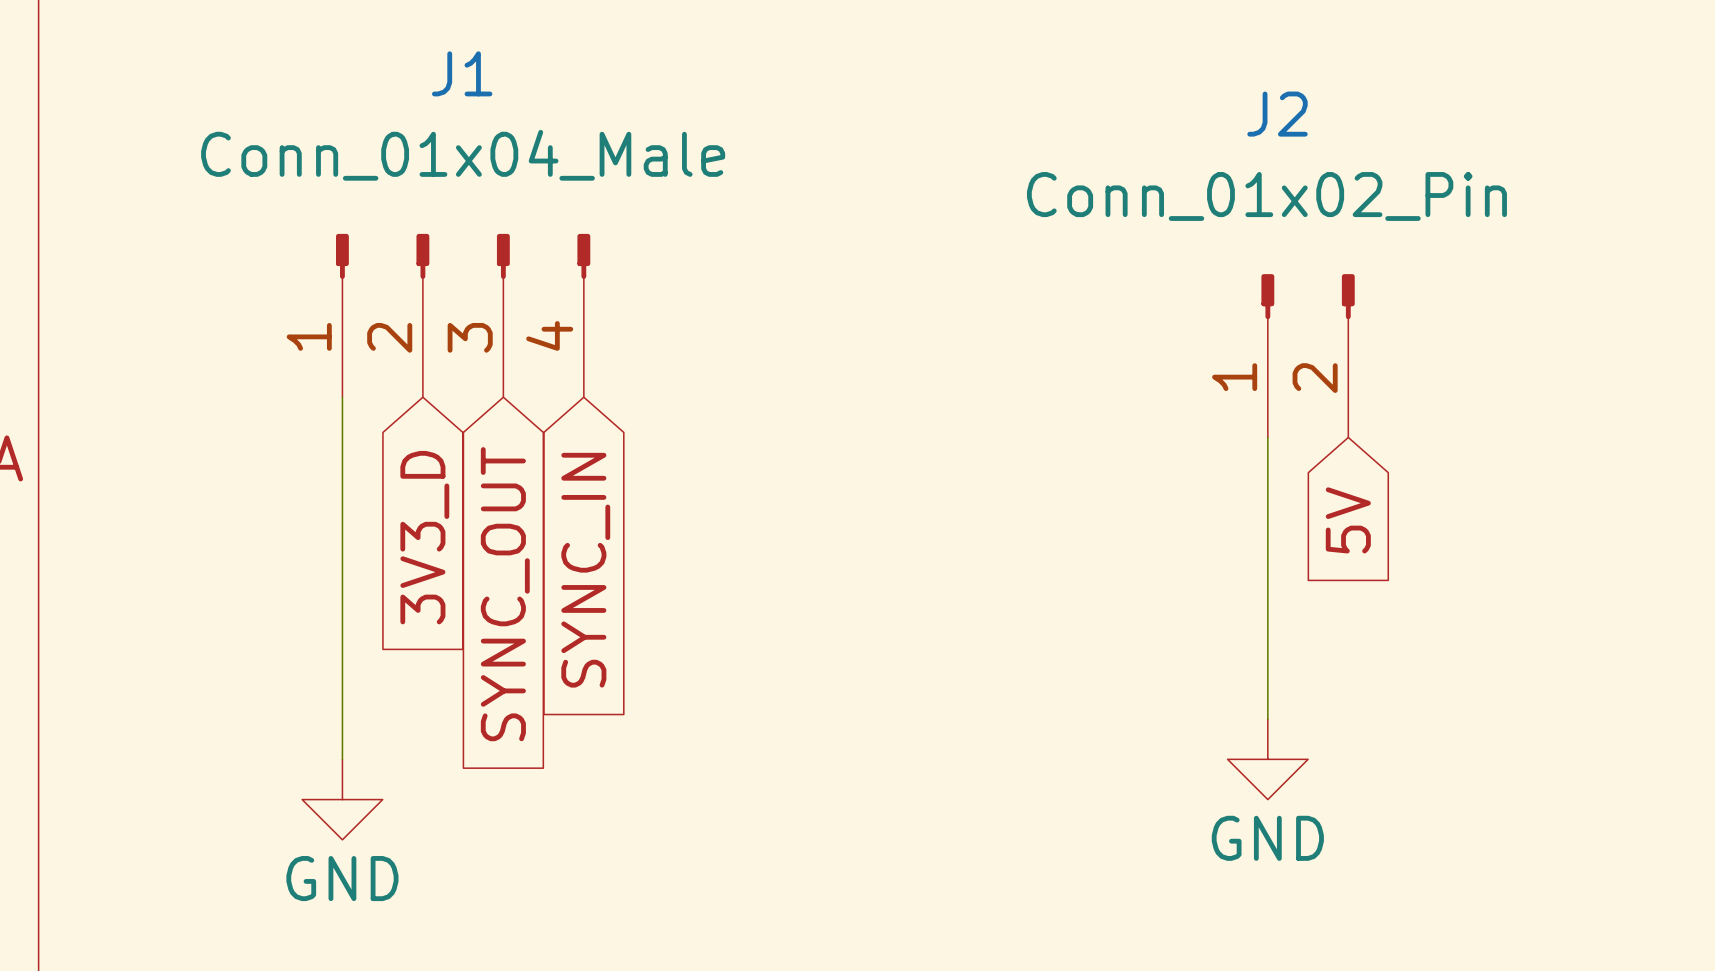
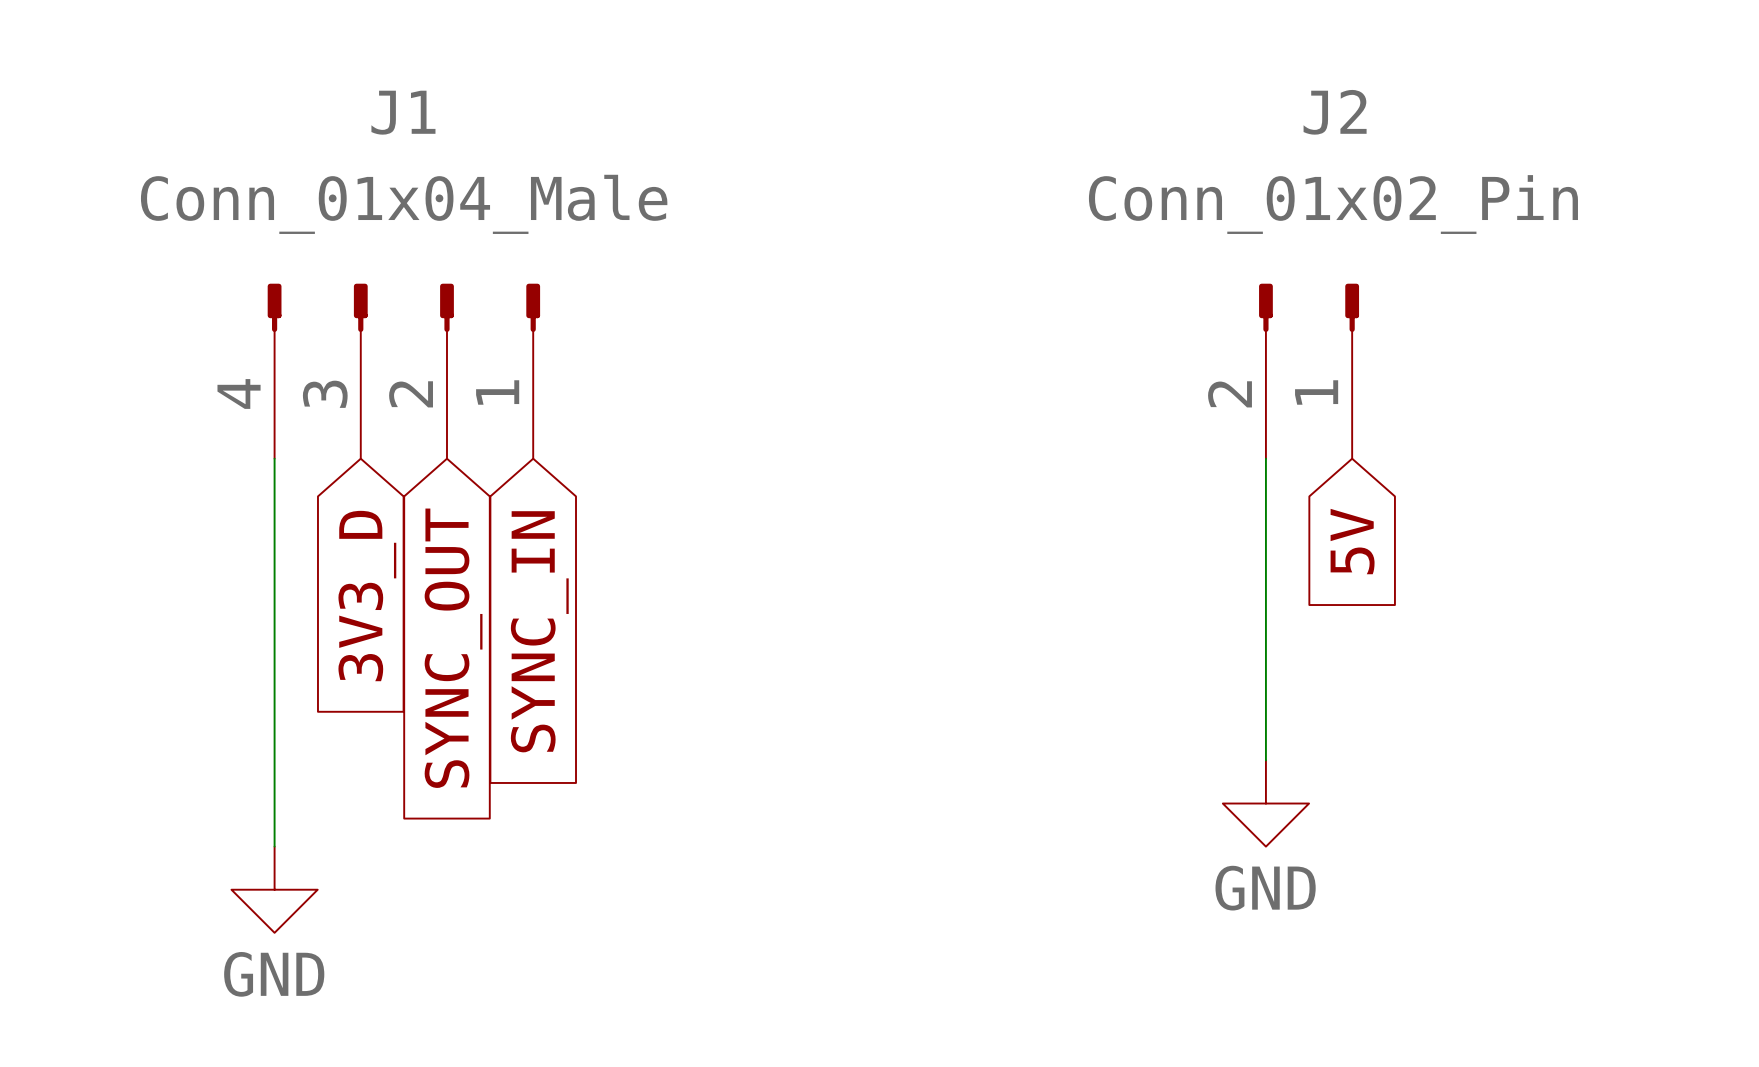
J1 flip: as is (463, 256) -> left-right (403, 307)
J2 flip: as is (1308, 296) -> left-right (1309, 307)
global label position: 5V (1348, 520) -> 5V (1352, 541)
power symbol position: GND (1267, 759) -> GND (1265, 803)

